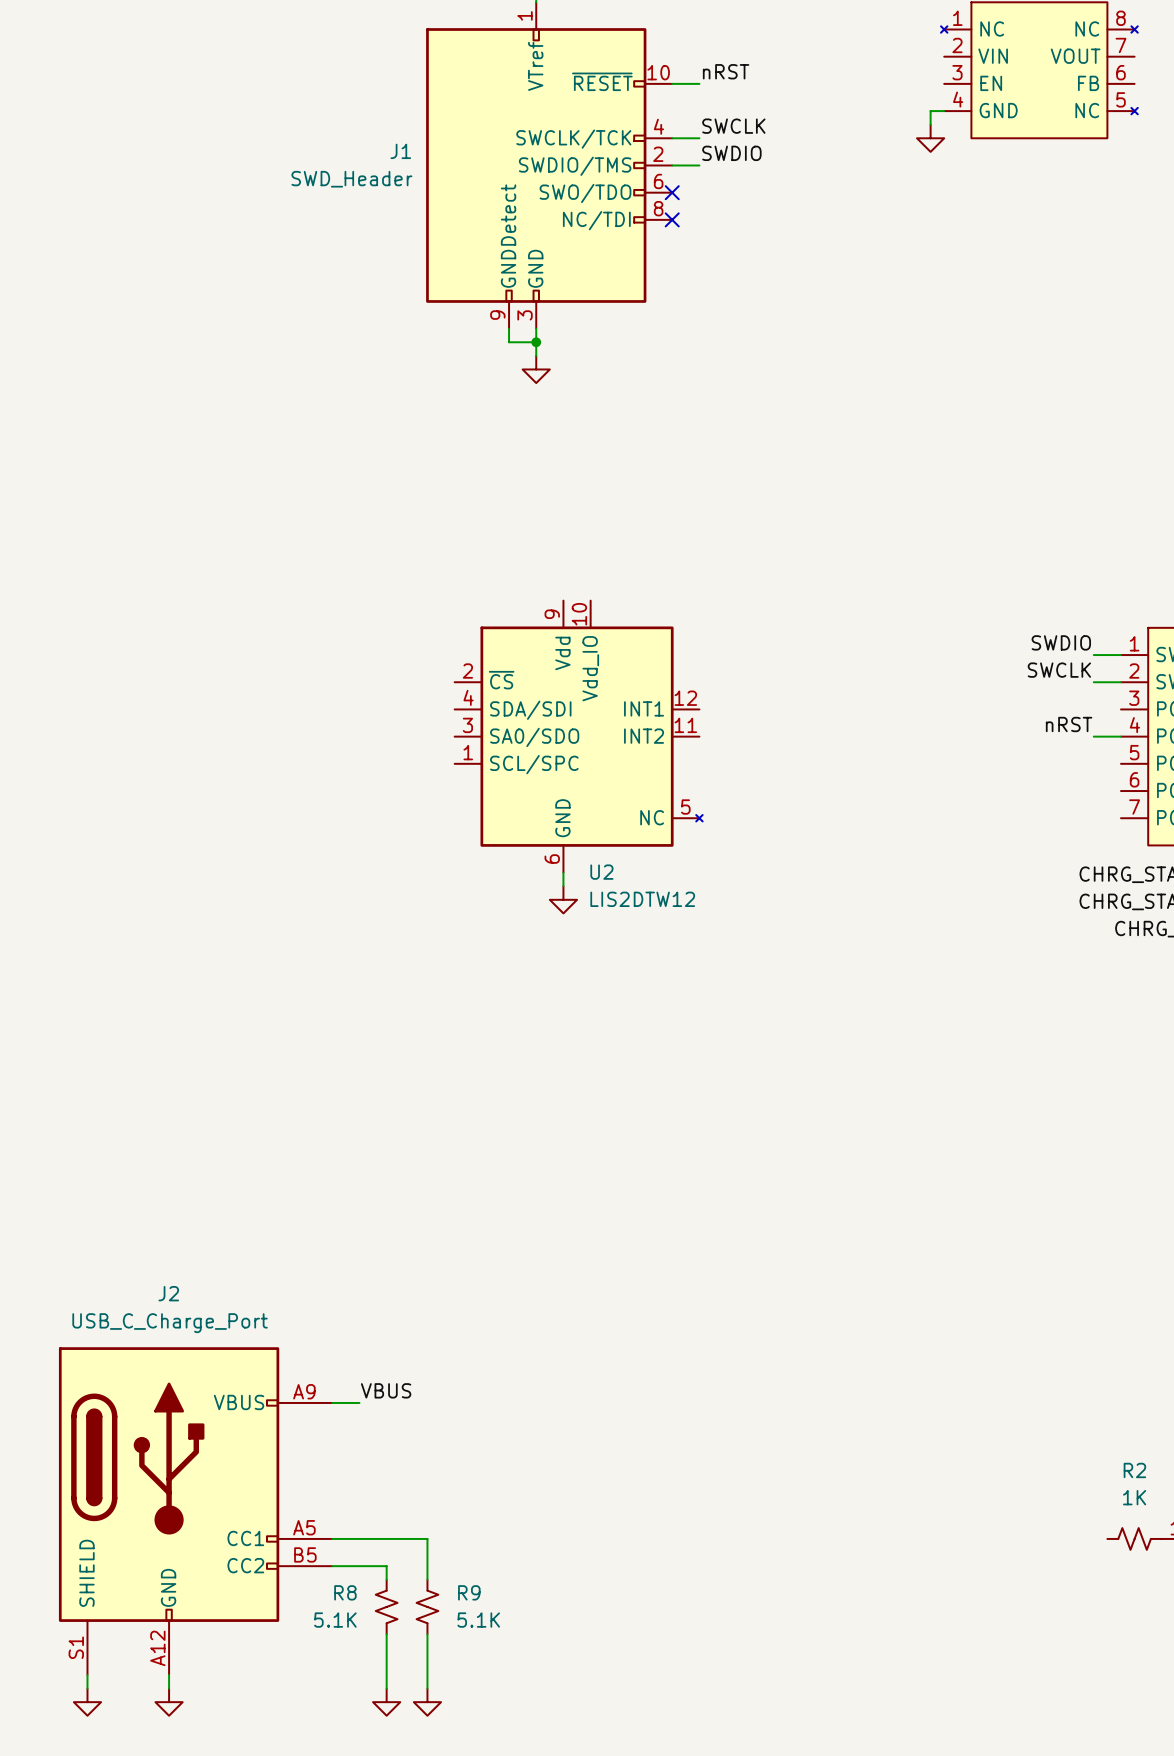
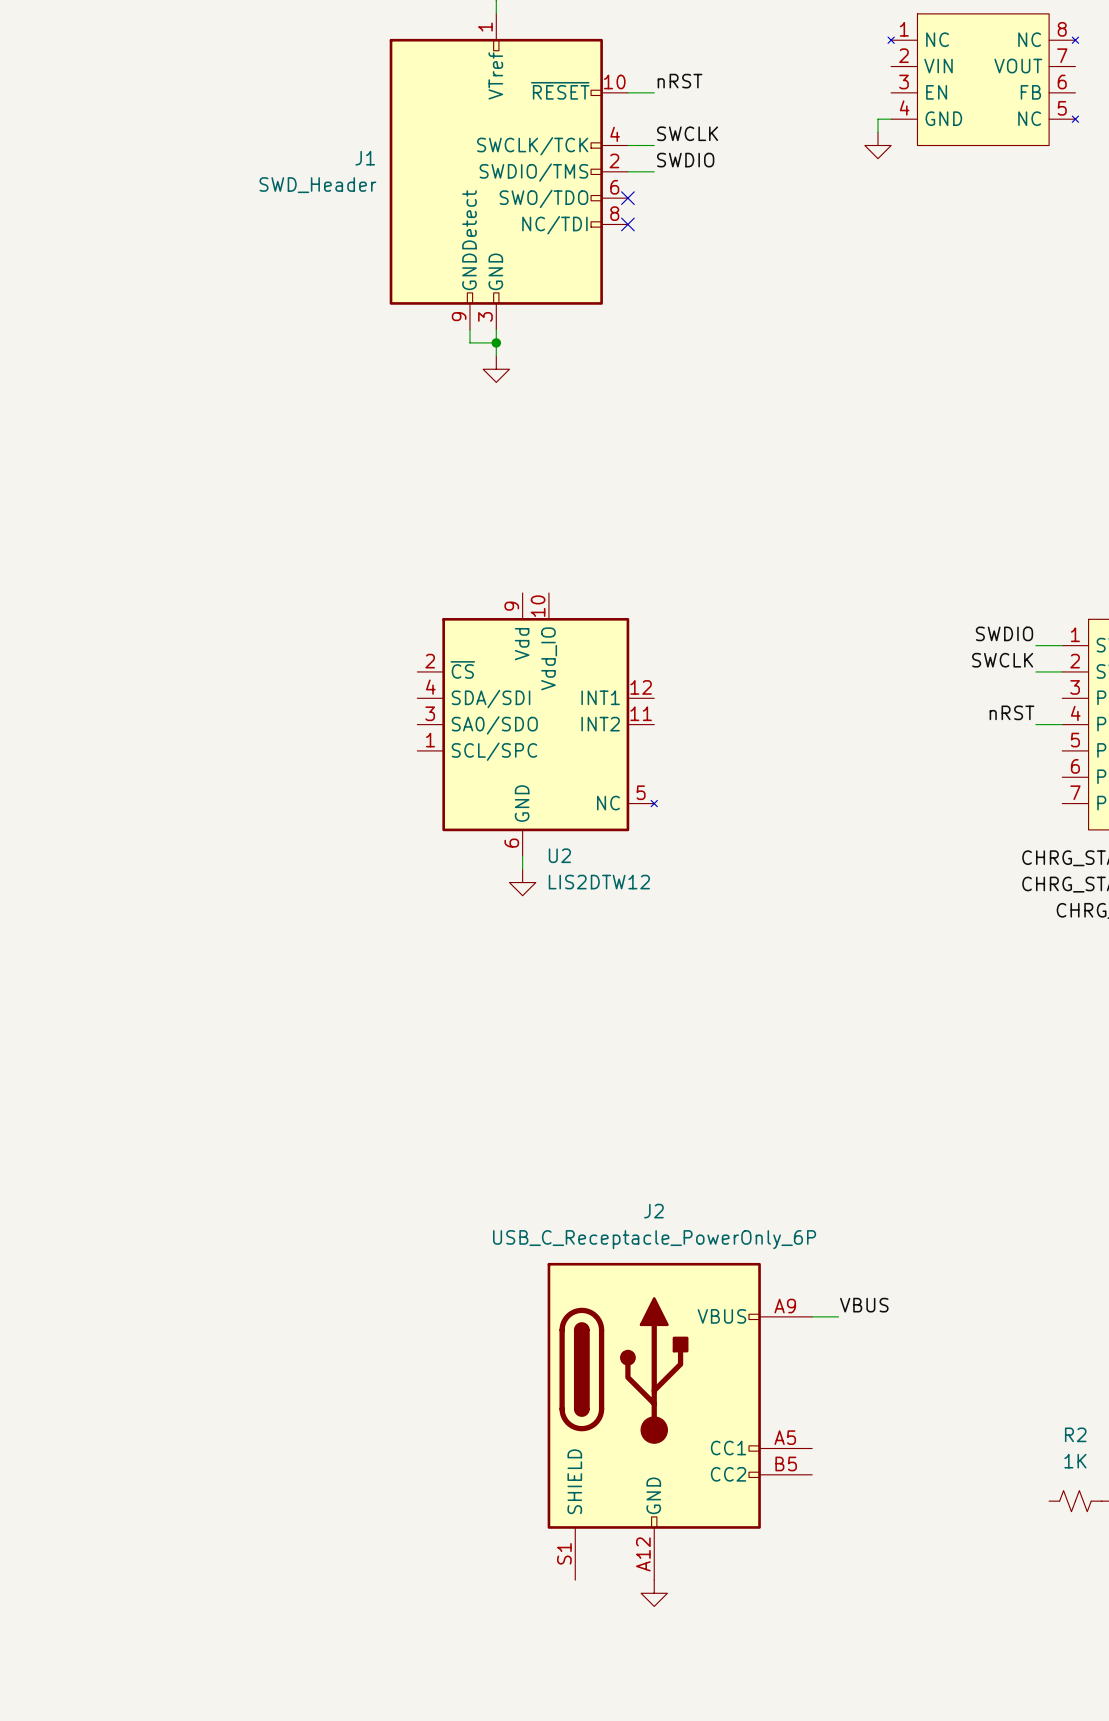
J2 value: USB_C_Charge_Port (170, 1323) -> USB_C_Receptacle_PowerOnly_6P (654, 1239)
label: none -> VBUS (864, 1305)
wire: none -> (812, 1316) (838, 1316)
label: VBUS (386, 1390) -> none
wire: (332, 1402) (359, 1402) -> none
J2 position: (195, 1511) -> (679, 1421)
wire: (332, 1538) (427, 1538) (427, 1579) -> none
wire: (332, 1566) (386, 1566) (386, 1579) -> none
R8: 5.1K (386, 1606) -> none
R9: 5.1K (427, 1606) -> none
wire: (386, 1634) (386, 1688) -> none
wire: (427, 1634) (427, 1688) -> none
power symbol: none -> (654, 1593)
wire: (87, 1674) (87, 1688) -> none
wire: (169, 1674) (169, 1688) -> none
power symbol: (87, 1702) -> none
power symbol: (169, 1702) -> none
power symbol: (386, 1702) -> none
power symbol: (427, 1702) -> none

